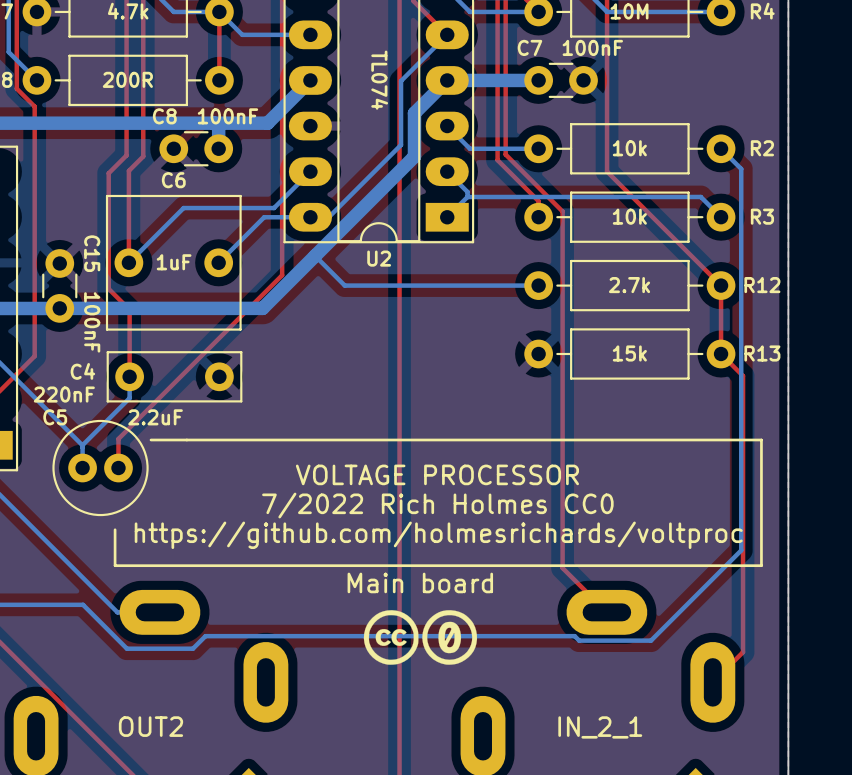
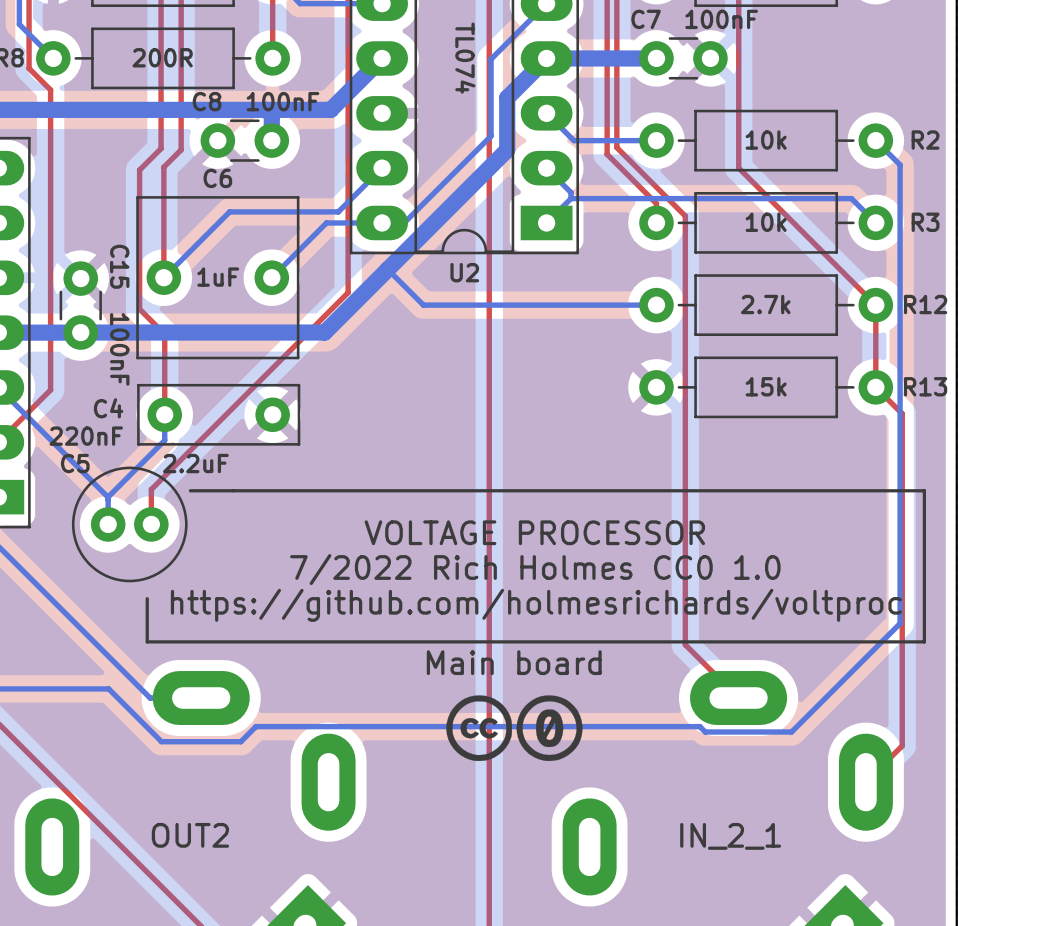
text: 7/2022 Rich Holmes CC0 (437, 505) -> 7/2022 Rich Holmes CC0 1.0 (535, 569)

